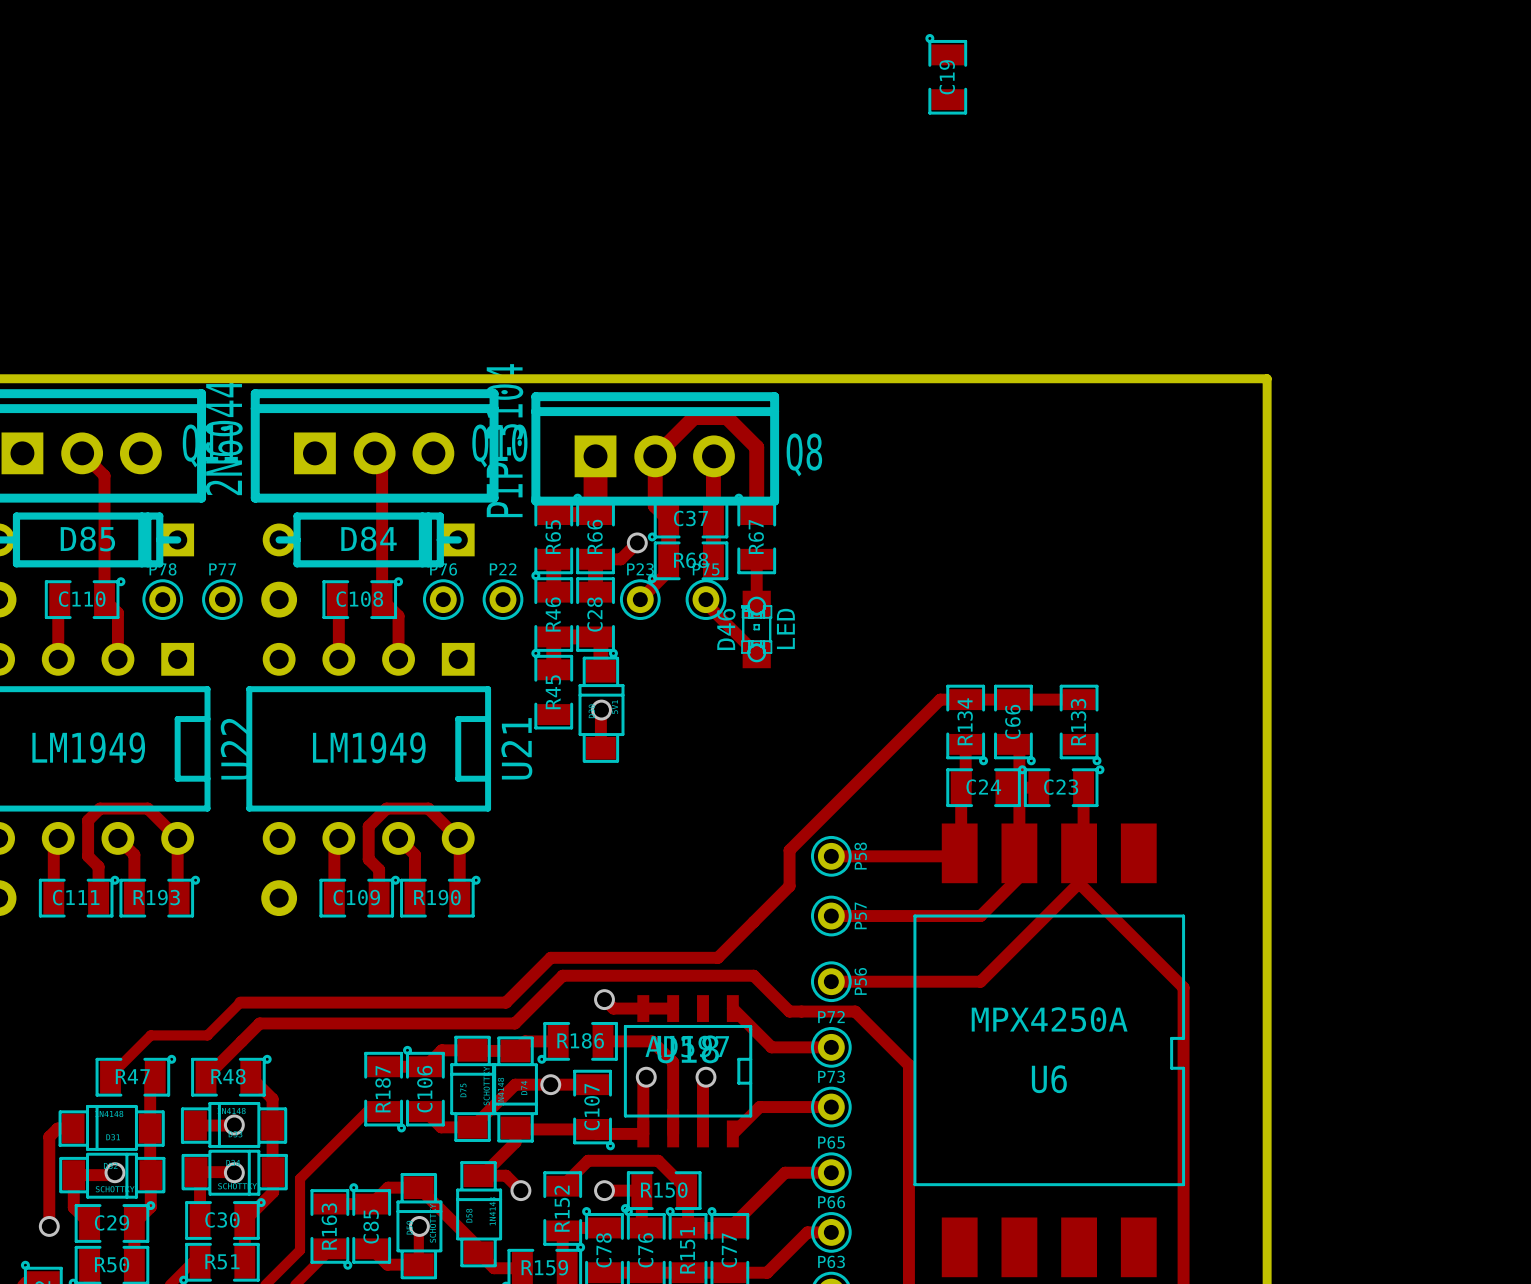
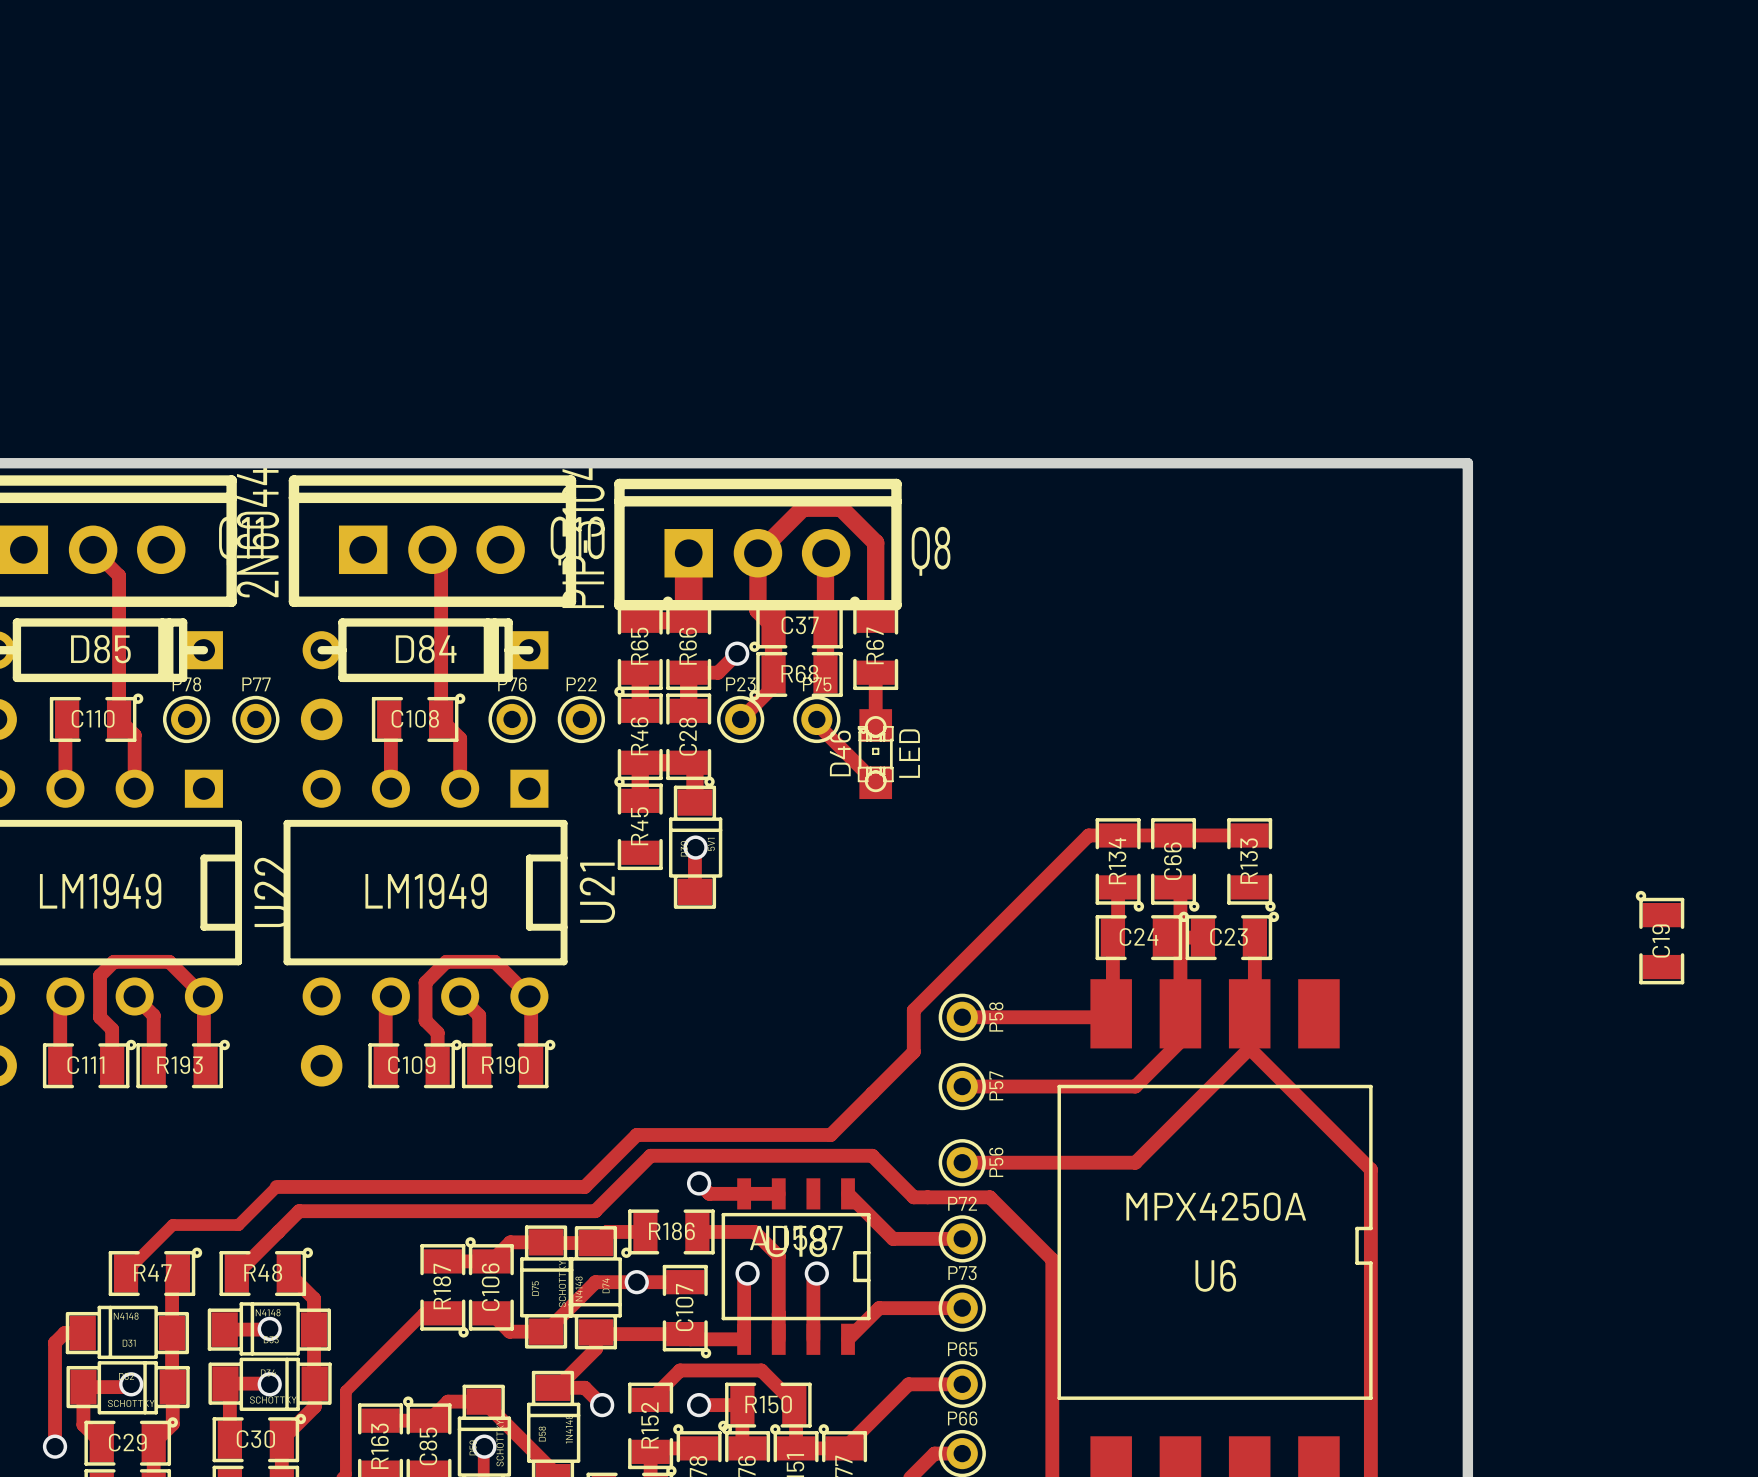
C19: (946, 74) -> none
C19: none -> (1660, 937)

